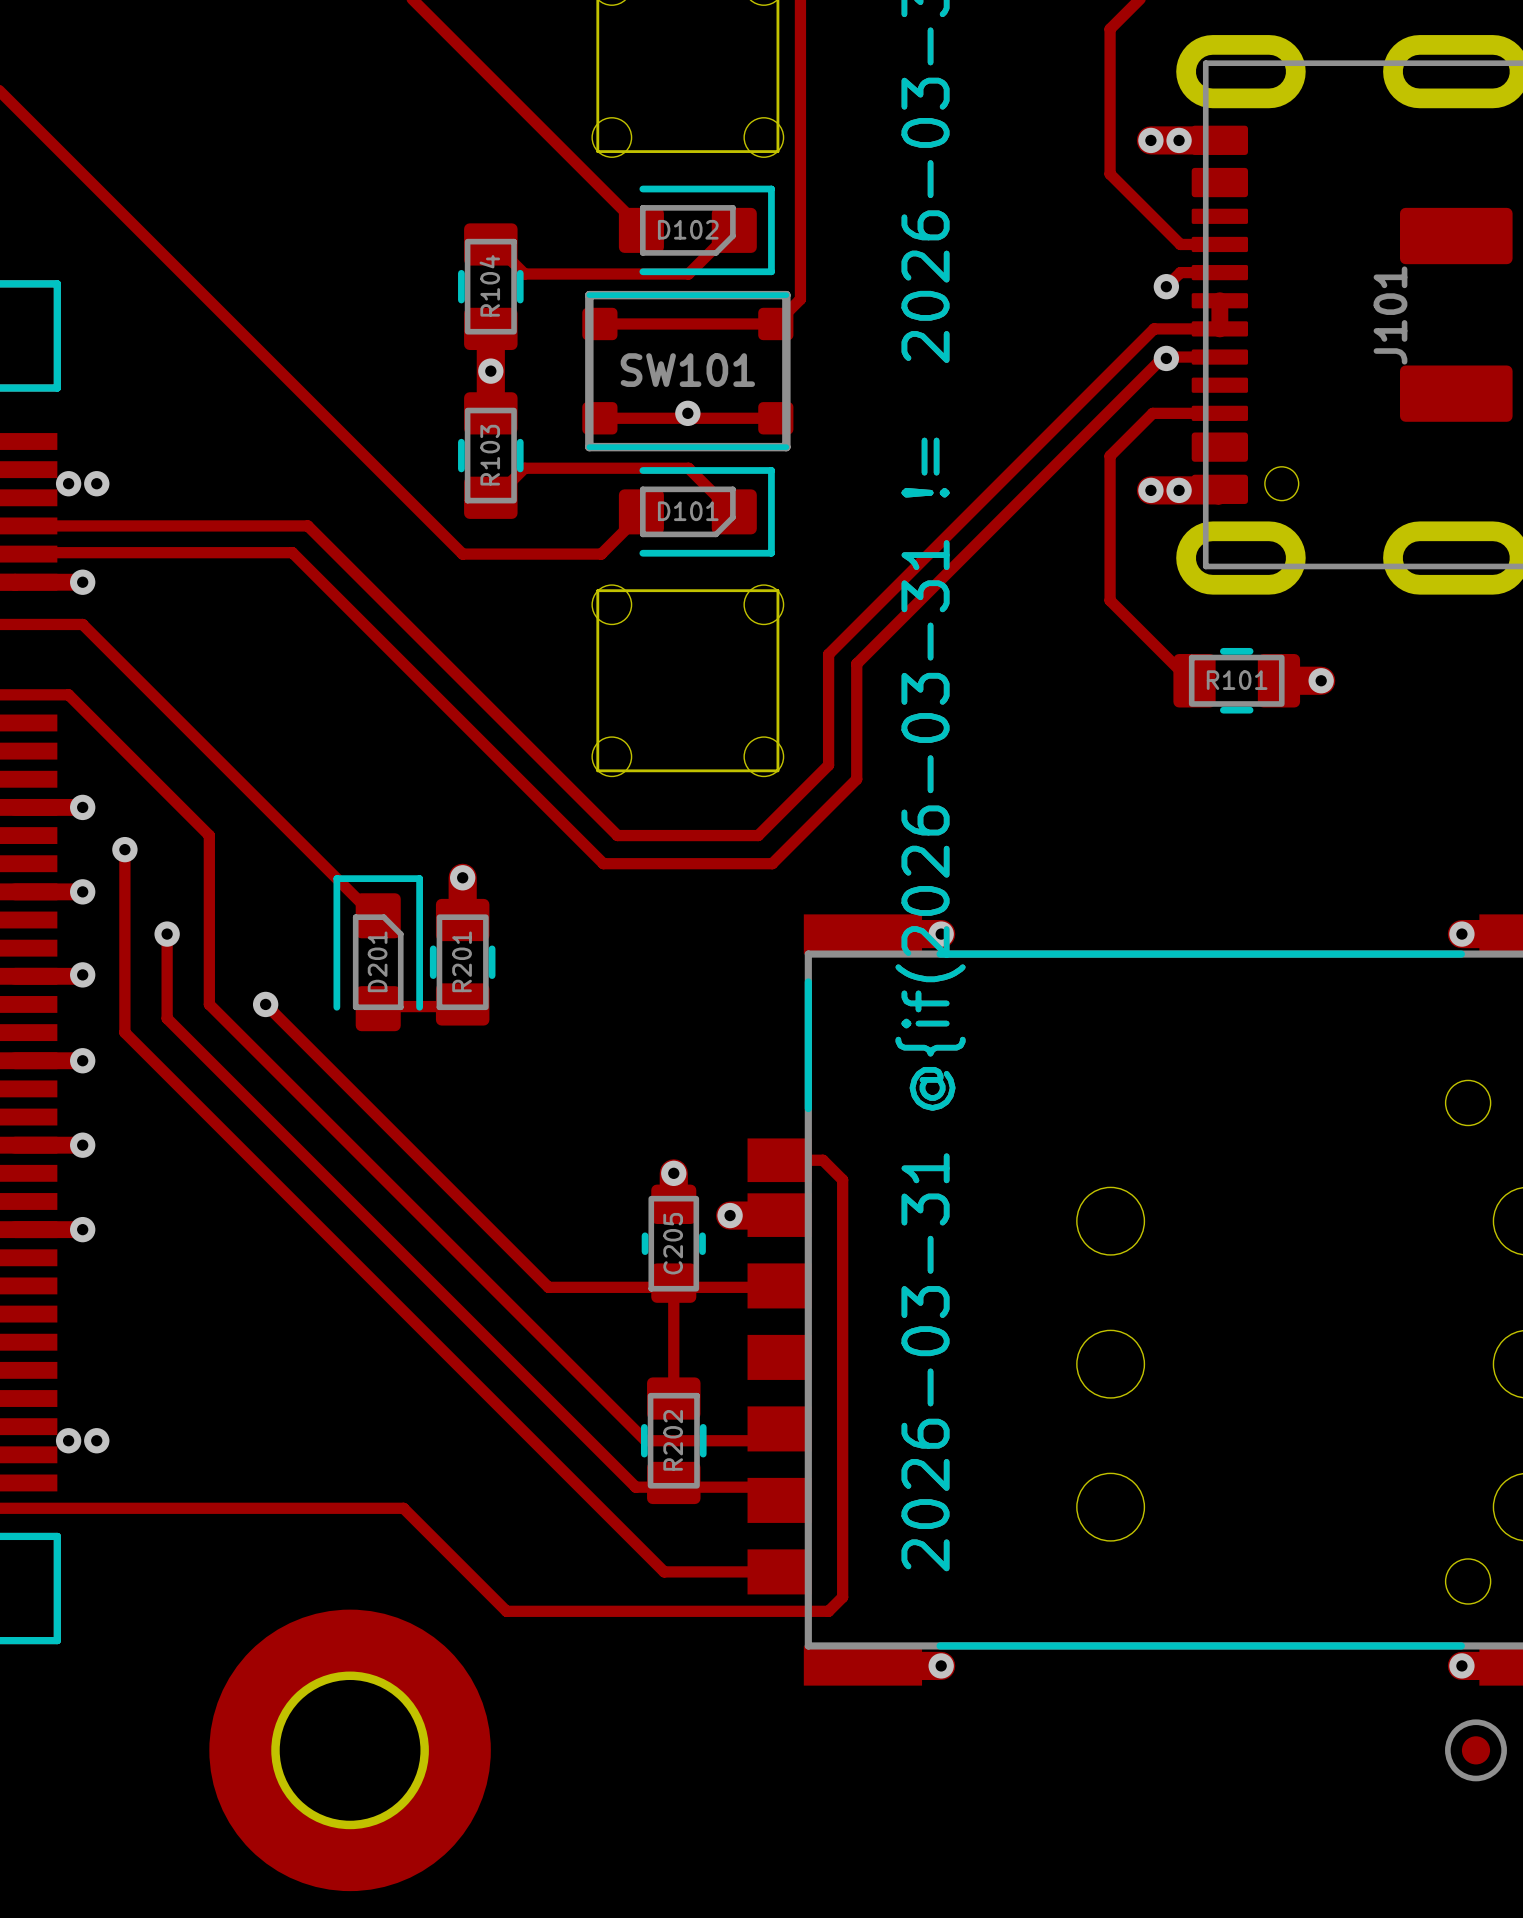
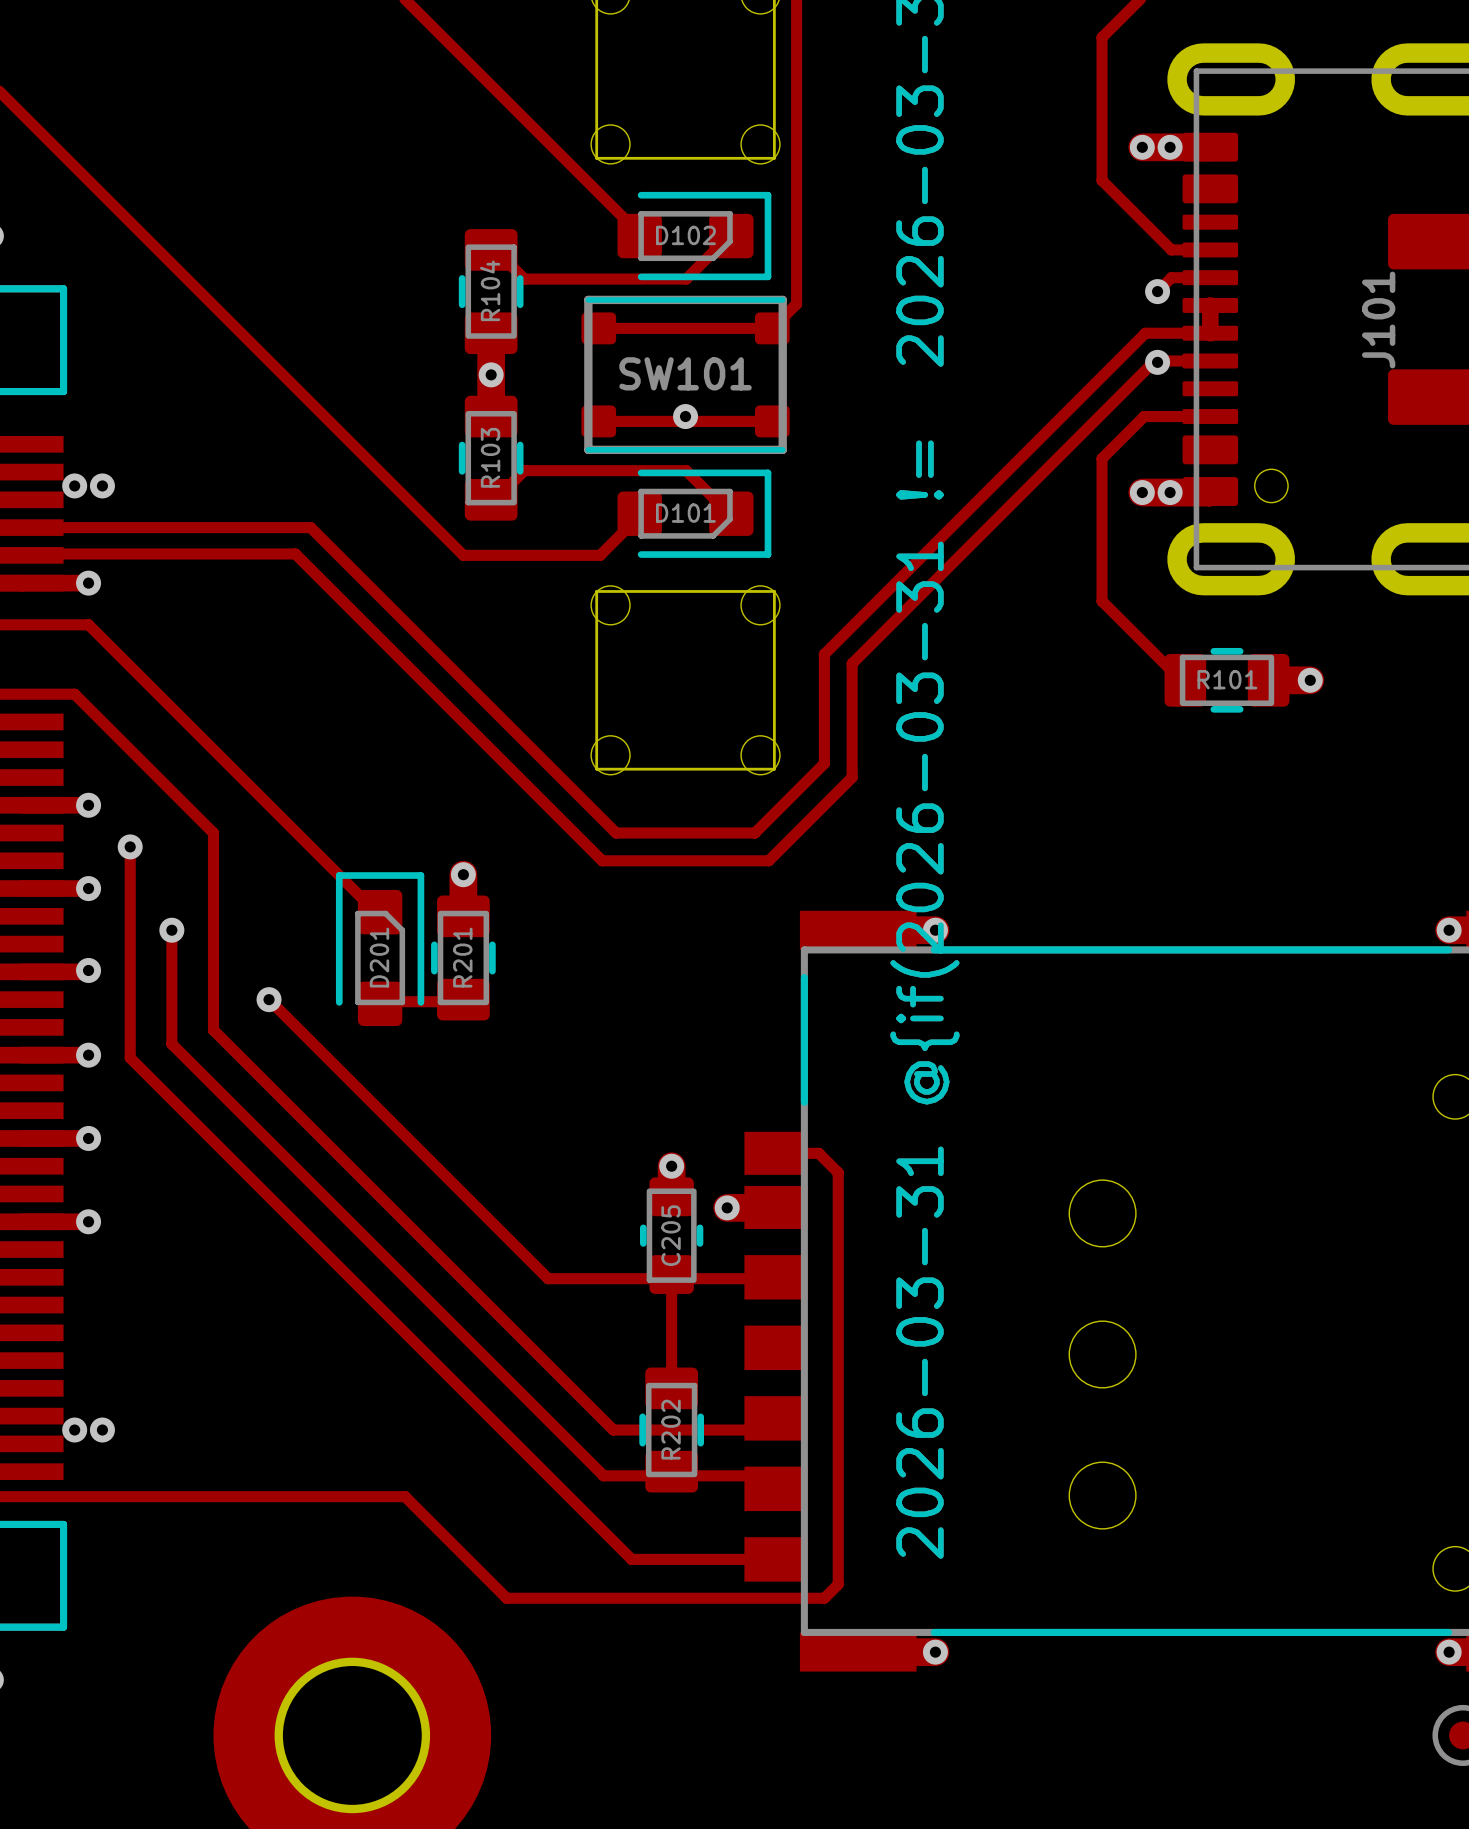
top track: (209, 1004) (645, 1440) -> (213, 999) (213, 1030) (613, 1430) (643, 1430)
top track: (167, 1018) (635, 1487) -> (171, 1013) (171, 1044) (603, 1475) (634, 1475)
top track: (124, 1032) (664, 1571) -> (130, 1027) (130, 1057) (631, 1559) (662, 1559)

